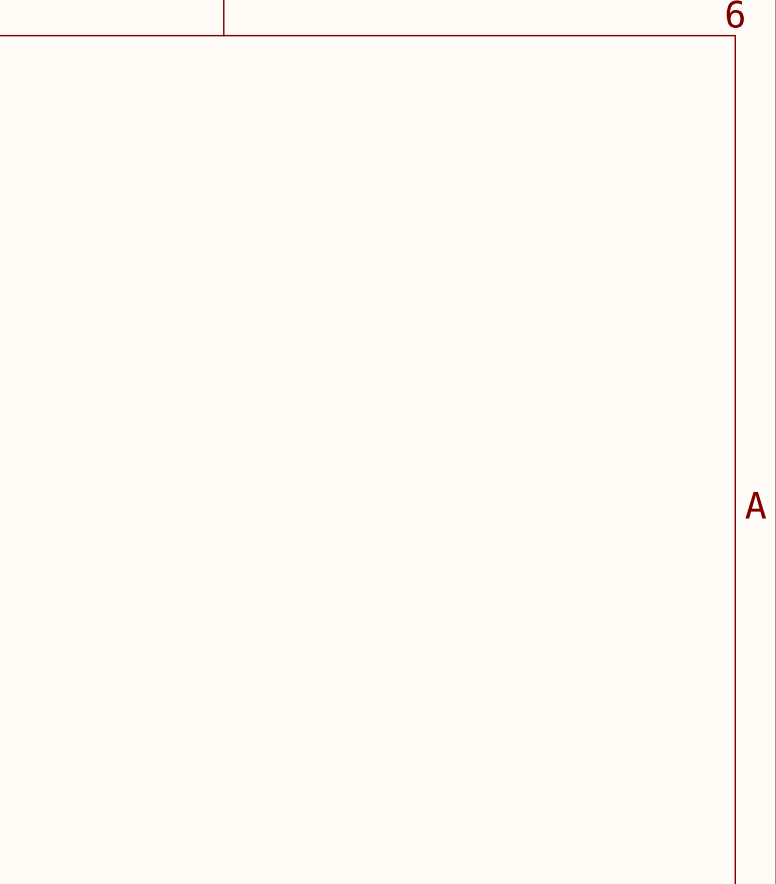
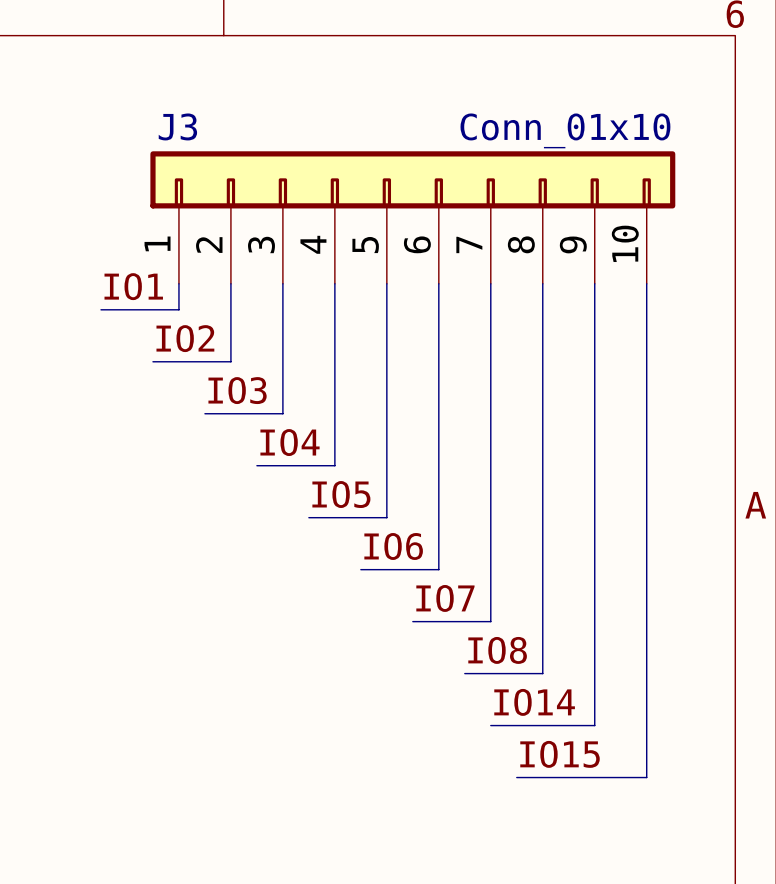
J3: none -> Conn_01x10 (412, 217)
wire: none -> (178, 283) (178, 309) (101, 309)
wire: none -> (230, 283) (230, 361) (152, 361)
wire: none -> (282, 283) (282, 413) (204, 413)
wire: none -> (334, 283) (334, 465) (256, 465)
wire: none -> (386, 283) (386, 517) (308, 517)
wire: none -> (438, 283) (438, 569) (360, 569)
wire: none -> (490, 283) (490, 621) (412, 621)
wire: none -> (542, 283) (542, 673) (464, 673)
wire: none -> (594, 283) (594, 725) (490, 725)
wire: none -> (646, 283) (646, 777) (516, 777)
label: none -> IO1 (133, 286)
label: none -> IO2 (185, 338)
label: none -> IO3 (237, 390)
label: none -> IO4 (290, 442)
label: none -> IO5 (341, 494)
label: none -> IO6 (393, 546)
label: none -> IO7 (445, 598)
label: none -> IO8 (497, 650)
label: none -> IO14 (534, 702)
label: none -> IO15 (560, 754)

